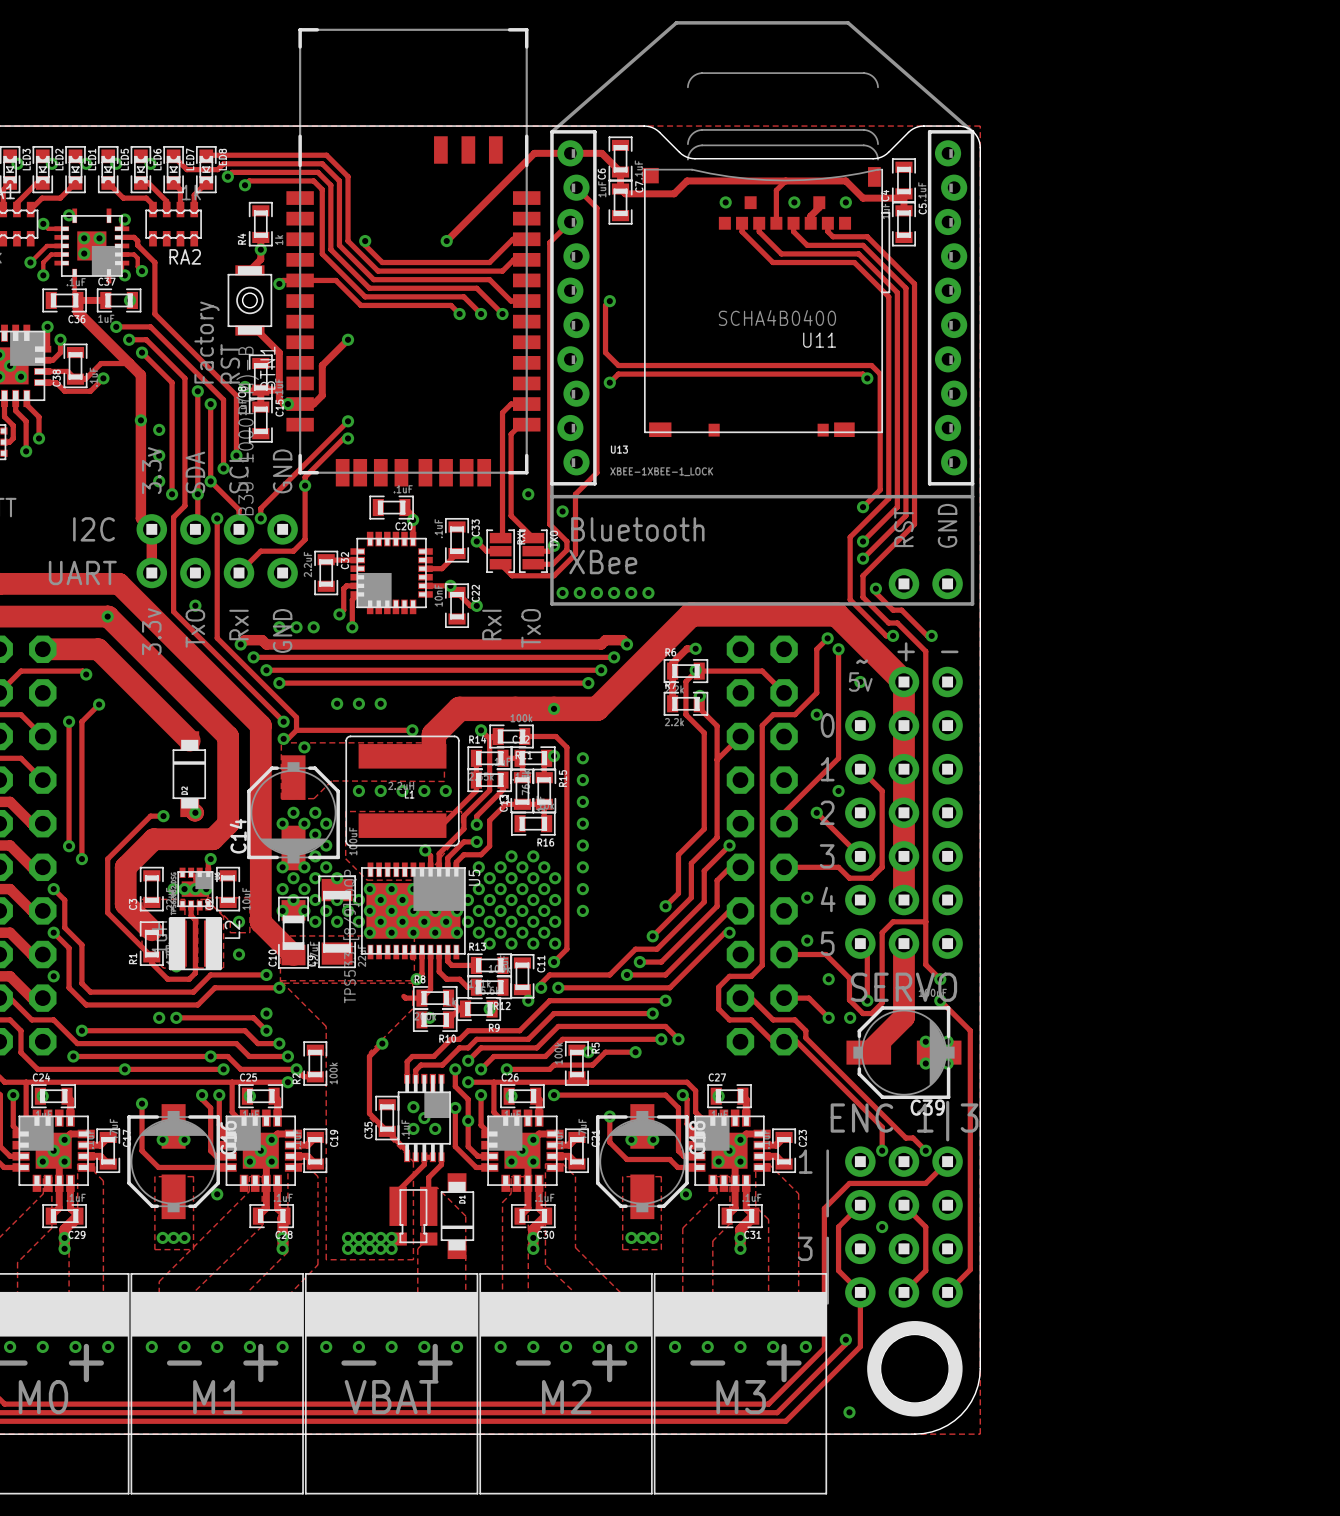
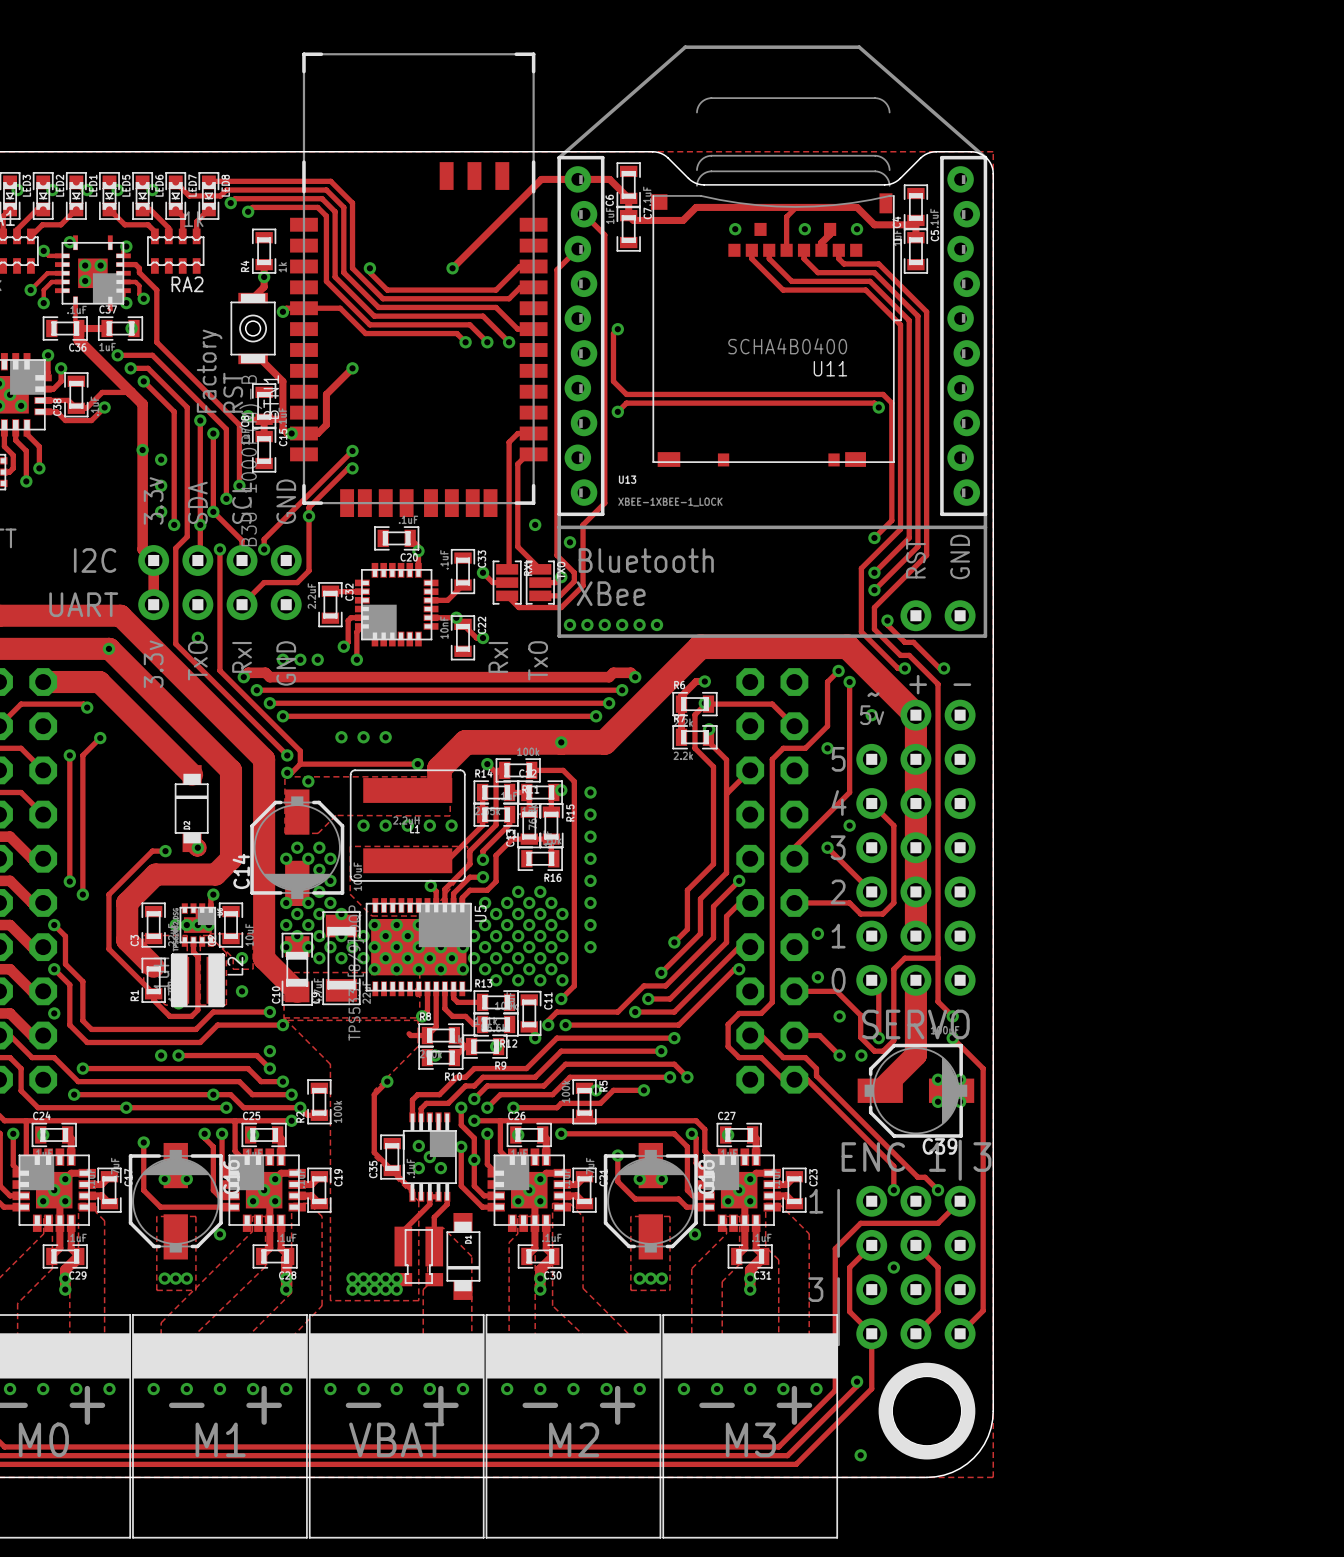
text: 0 (827, 725) -> 5 (838, 759)
text: 1 (827, 769) -> 4 (839, 803)
text: 2 (827, 812) -> 3 (838, 847)
text: 3 (827, 856) -> 2 (838, 891)
text: 4 (828, 899) -> 1 (838, 936)
text: 5 (827, 943) -> 0 (838, 980)

